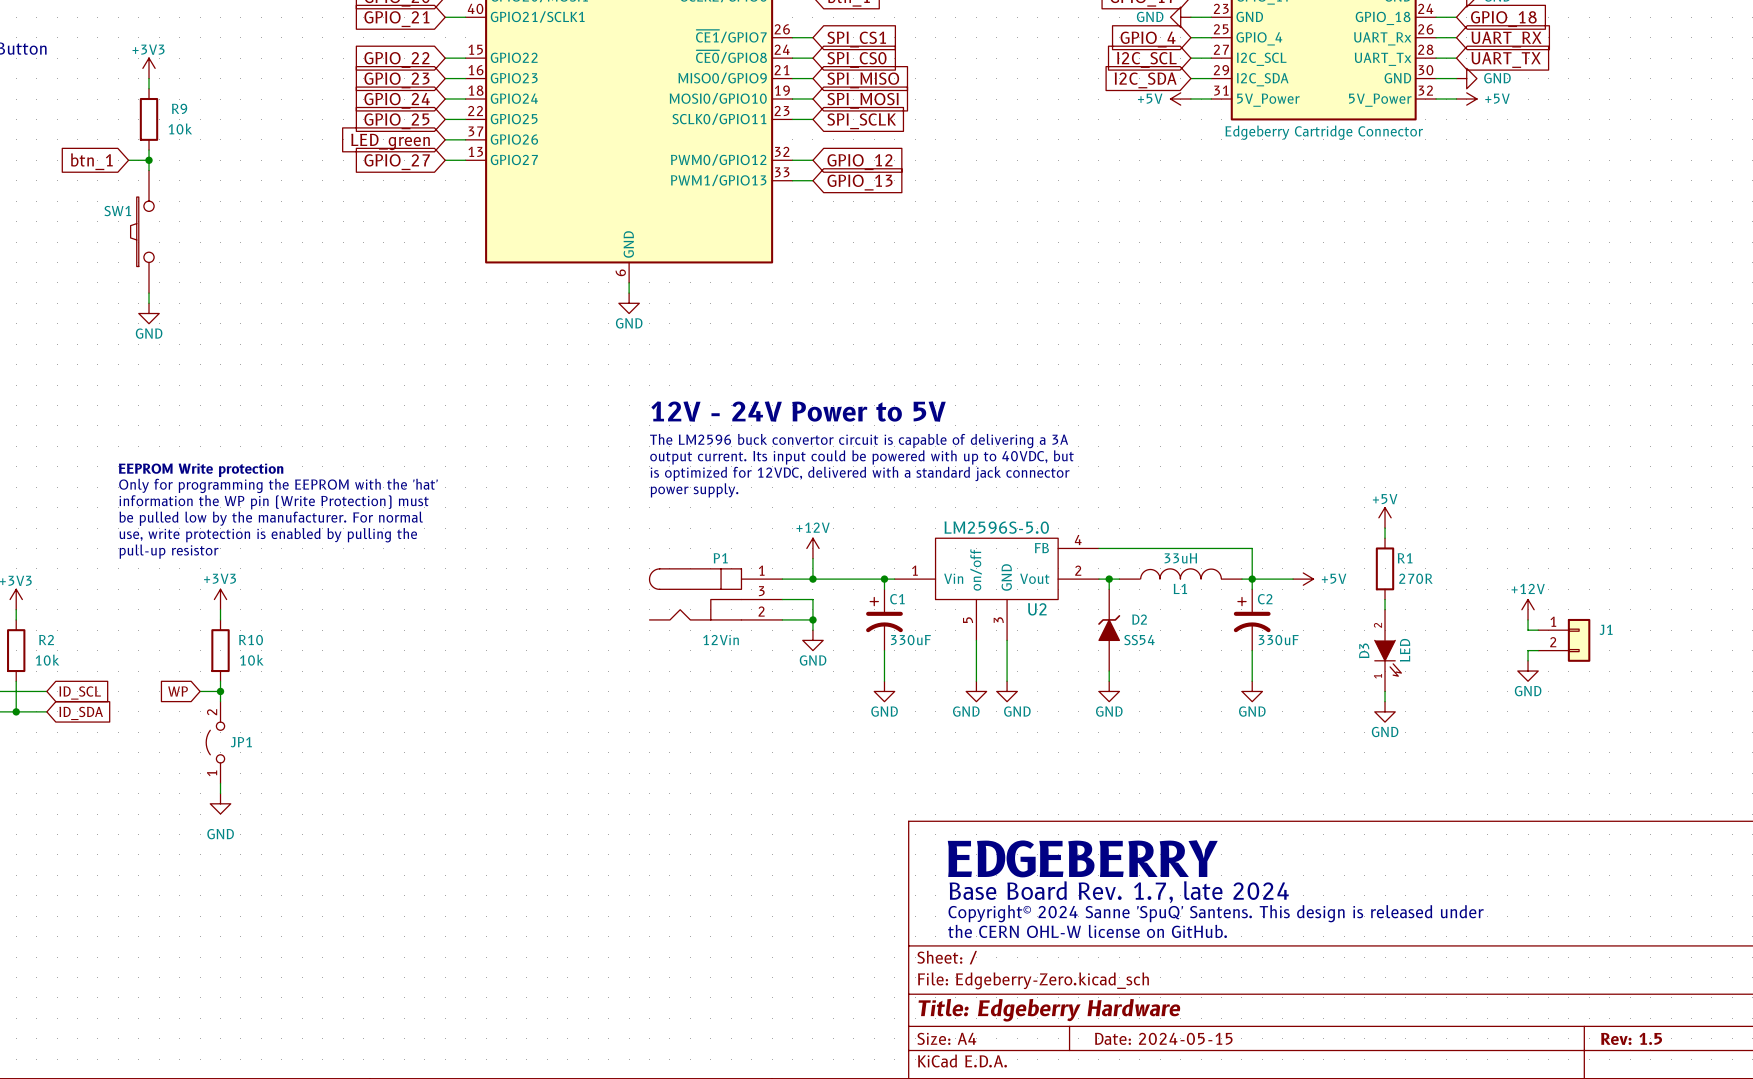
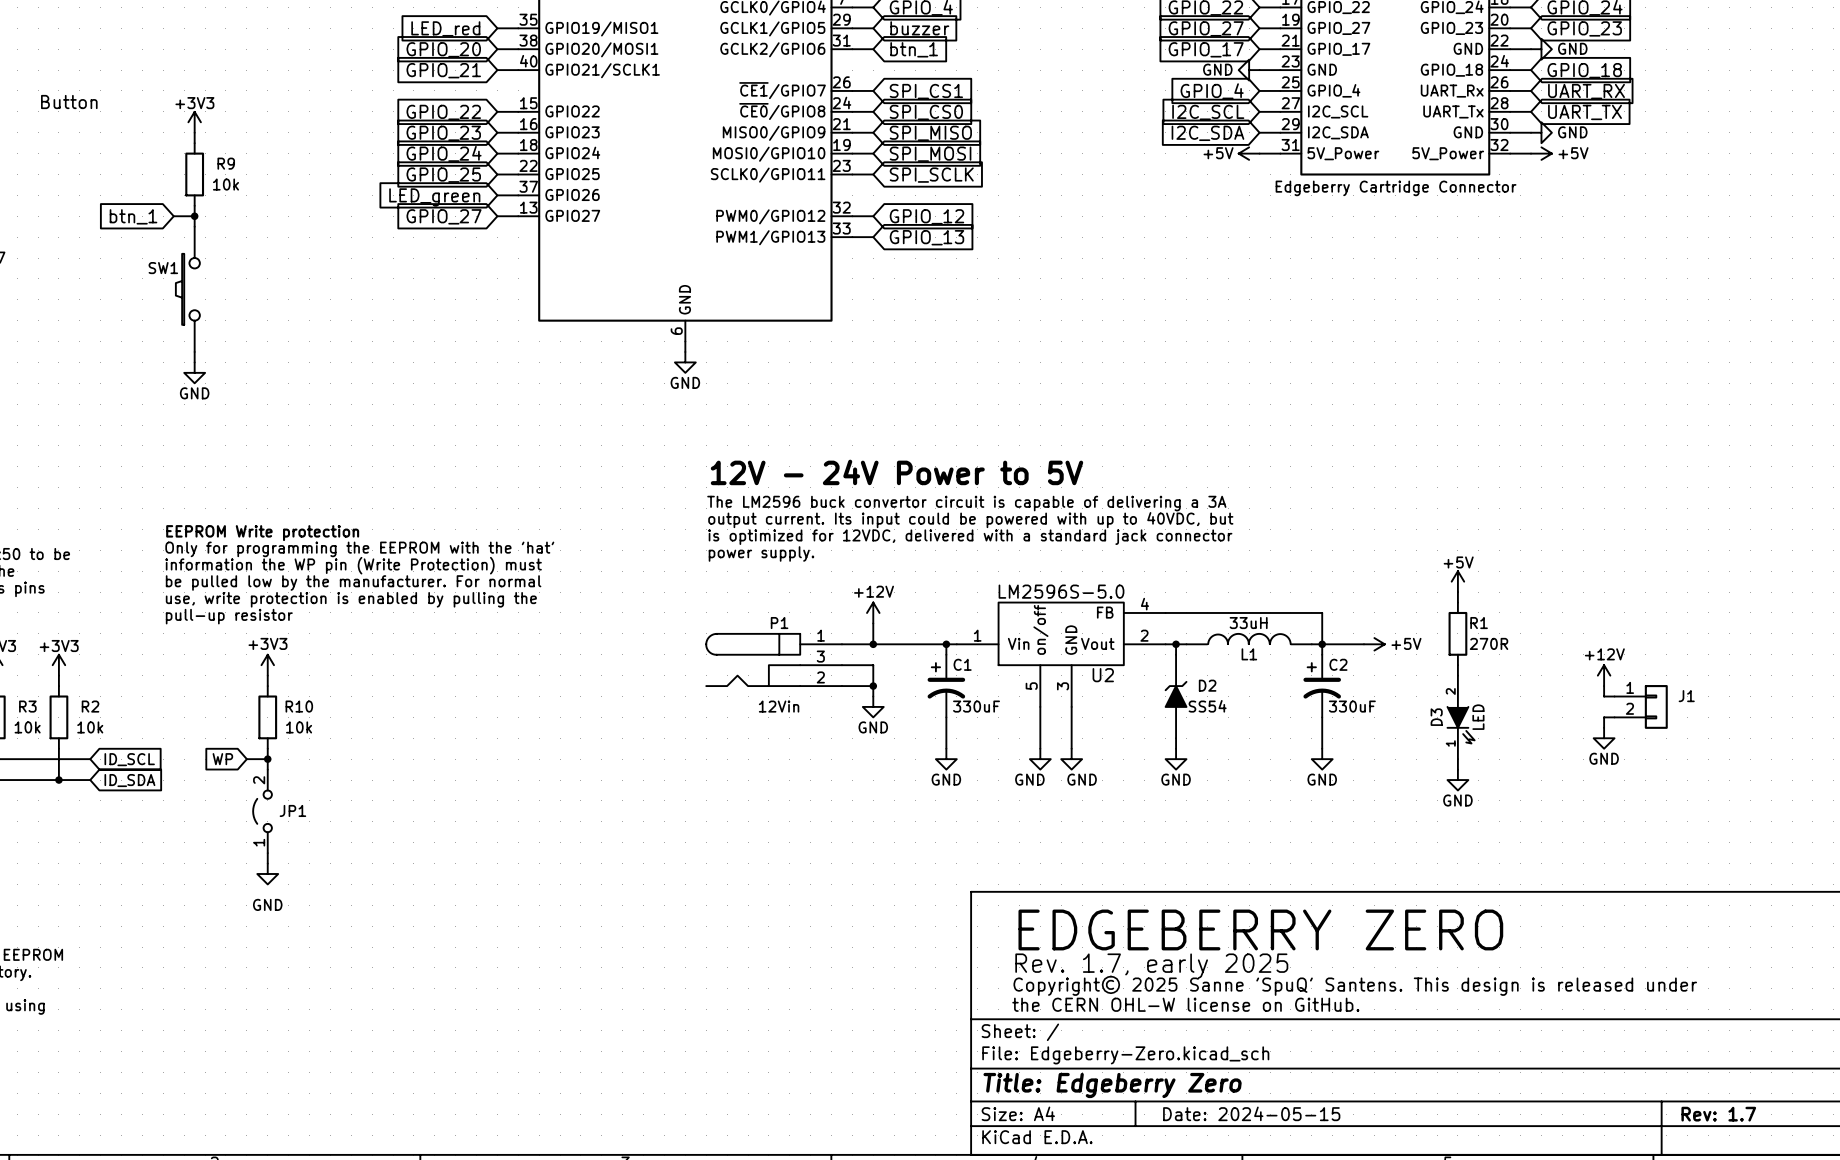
text: EDGEBERRY (1082, 858) -> EDGEBERRY ZERO (1260, 929)
text: Base Board Rev. 1.7, late 2024 (1119, 892) -> Rev. 1.7, early 2025 (1151, 966)
text: Copyright© 2024 Sanne 'SpuQ' Santens. This design is released under (1216, 913) -> Copyright© 2025 Sanne 'SpuQ' Santens. This design is released under (1355, 985)
title block: Title: Edgeberry Hardware (1049, 1010) -> Title: Edgeberry Zero (1112, 1085)
title block: Rev: 1.5 (1631, 1038) -> Rev: 1.7 (1718, 1114)

